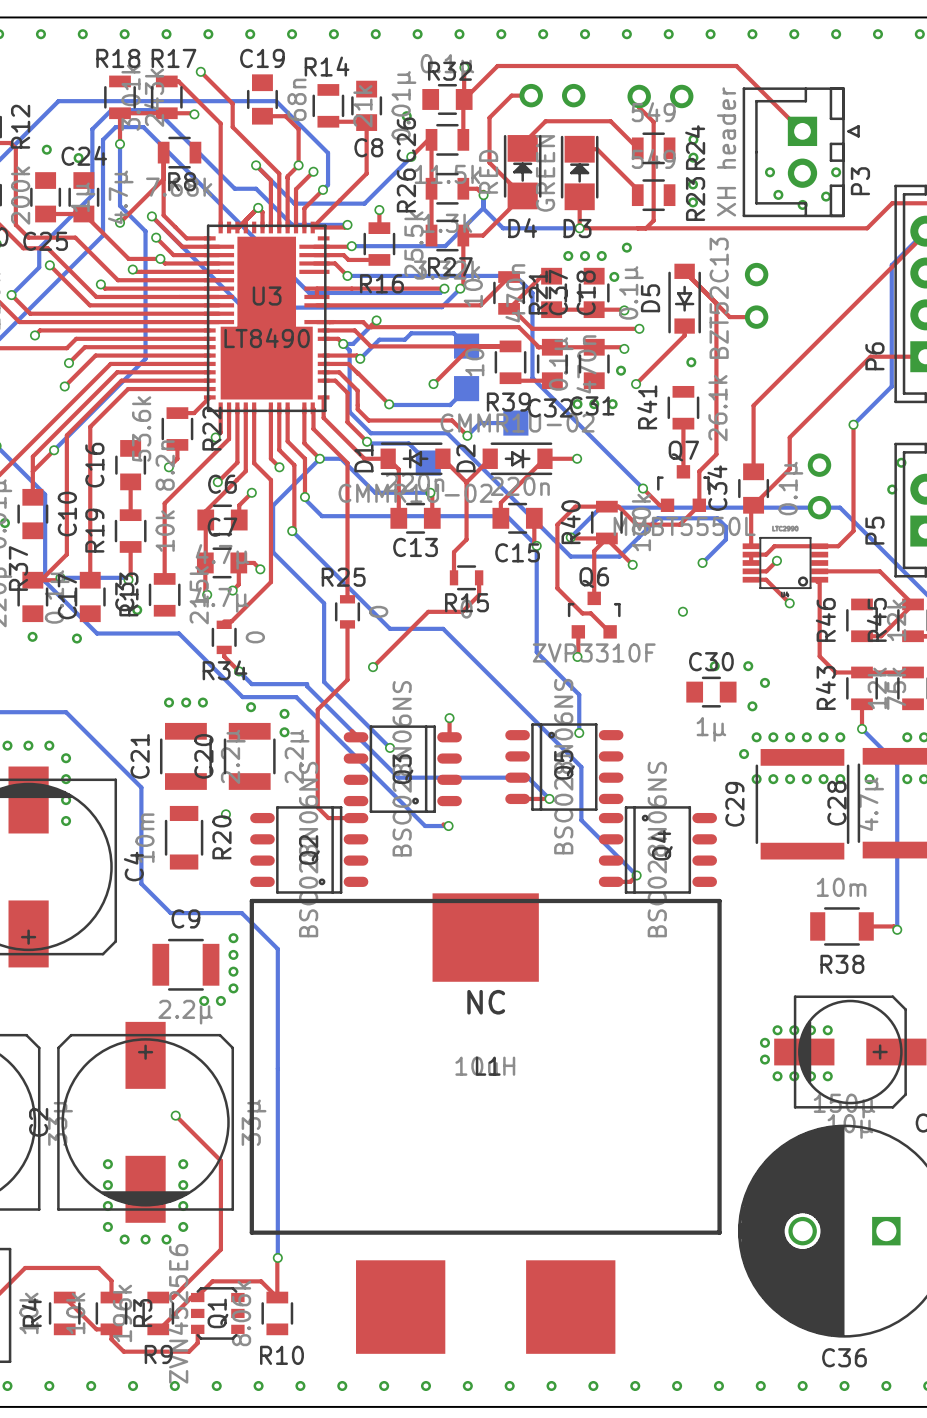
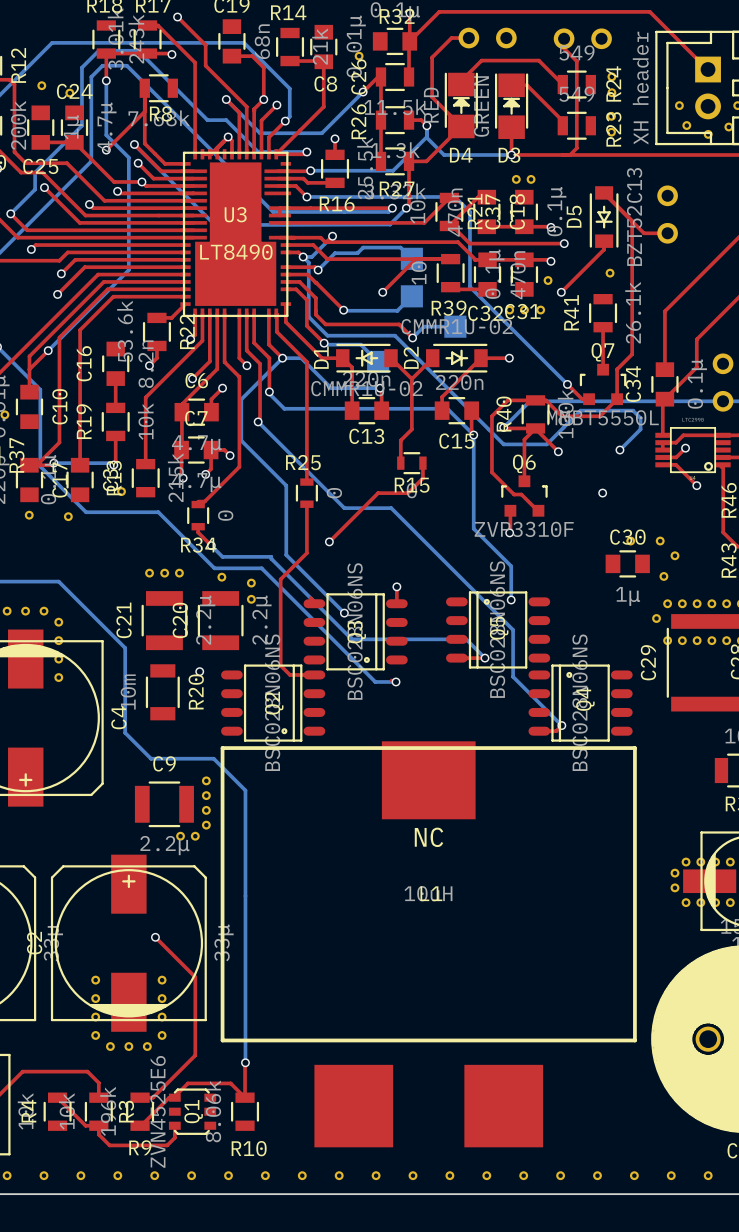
part: (626, 247) -> none
part: (568, 256) -> none
part: (614, 276) -> none

